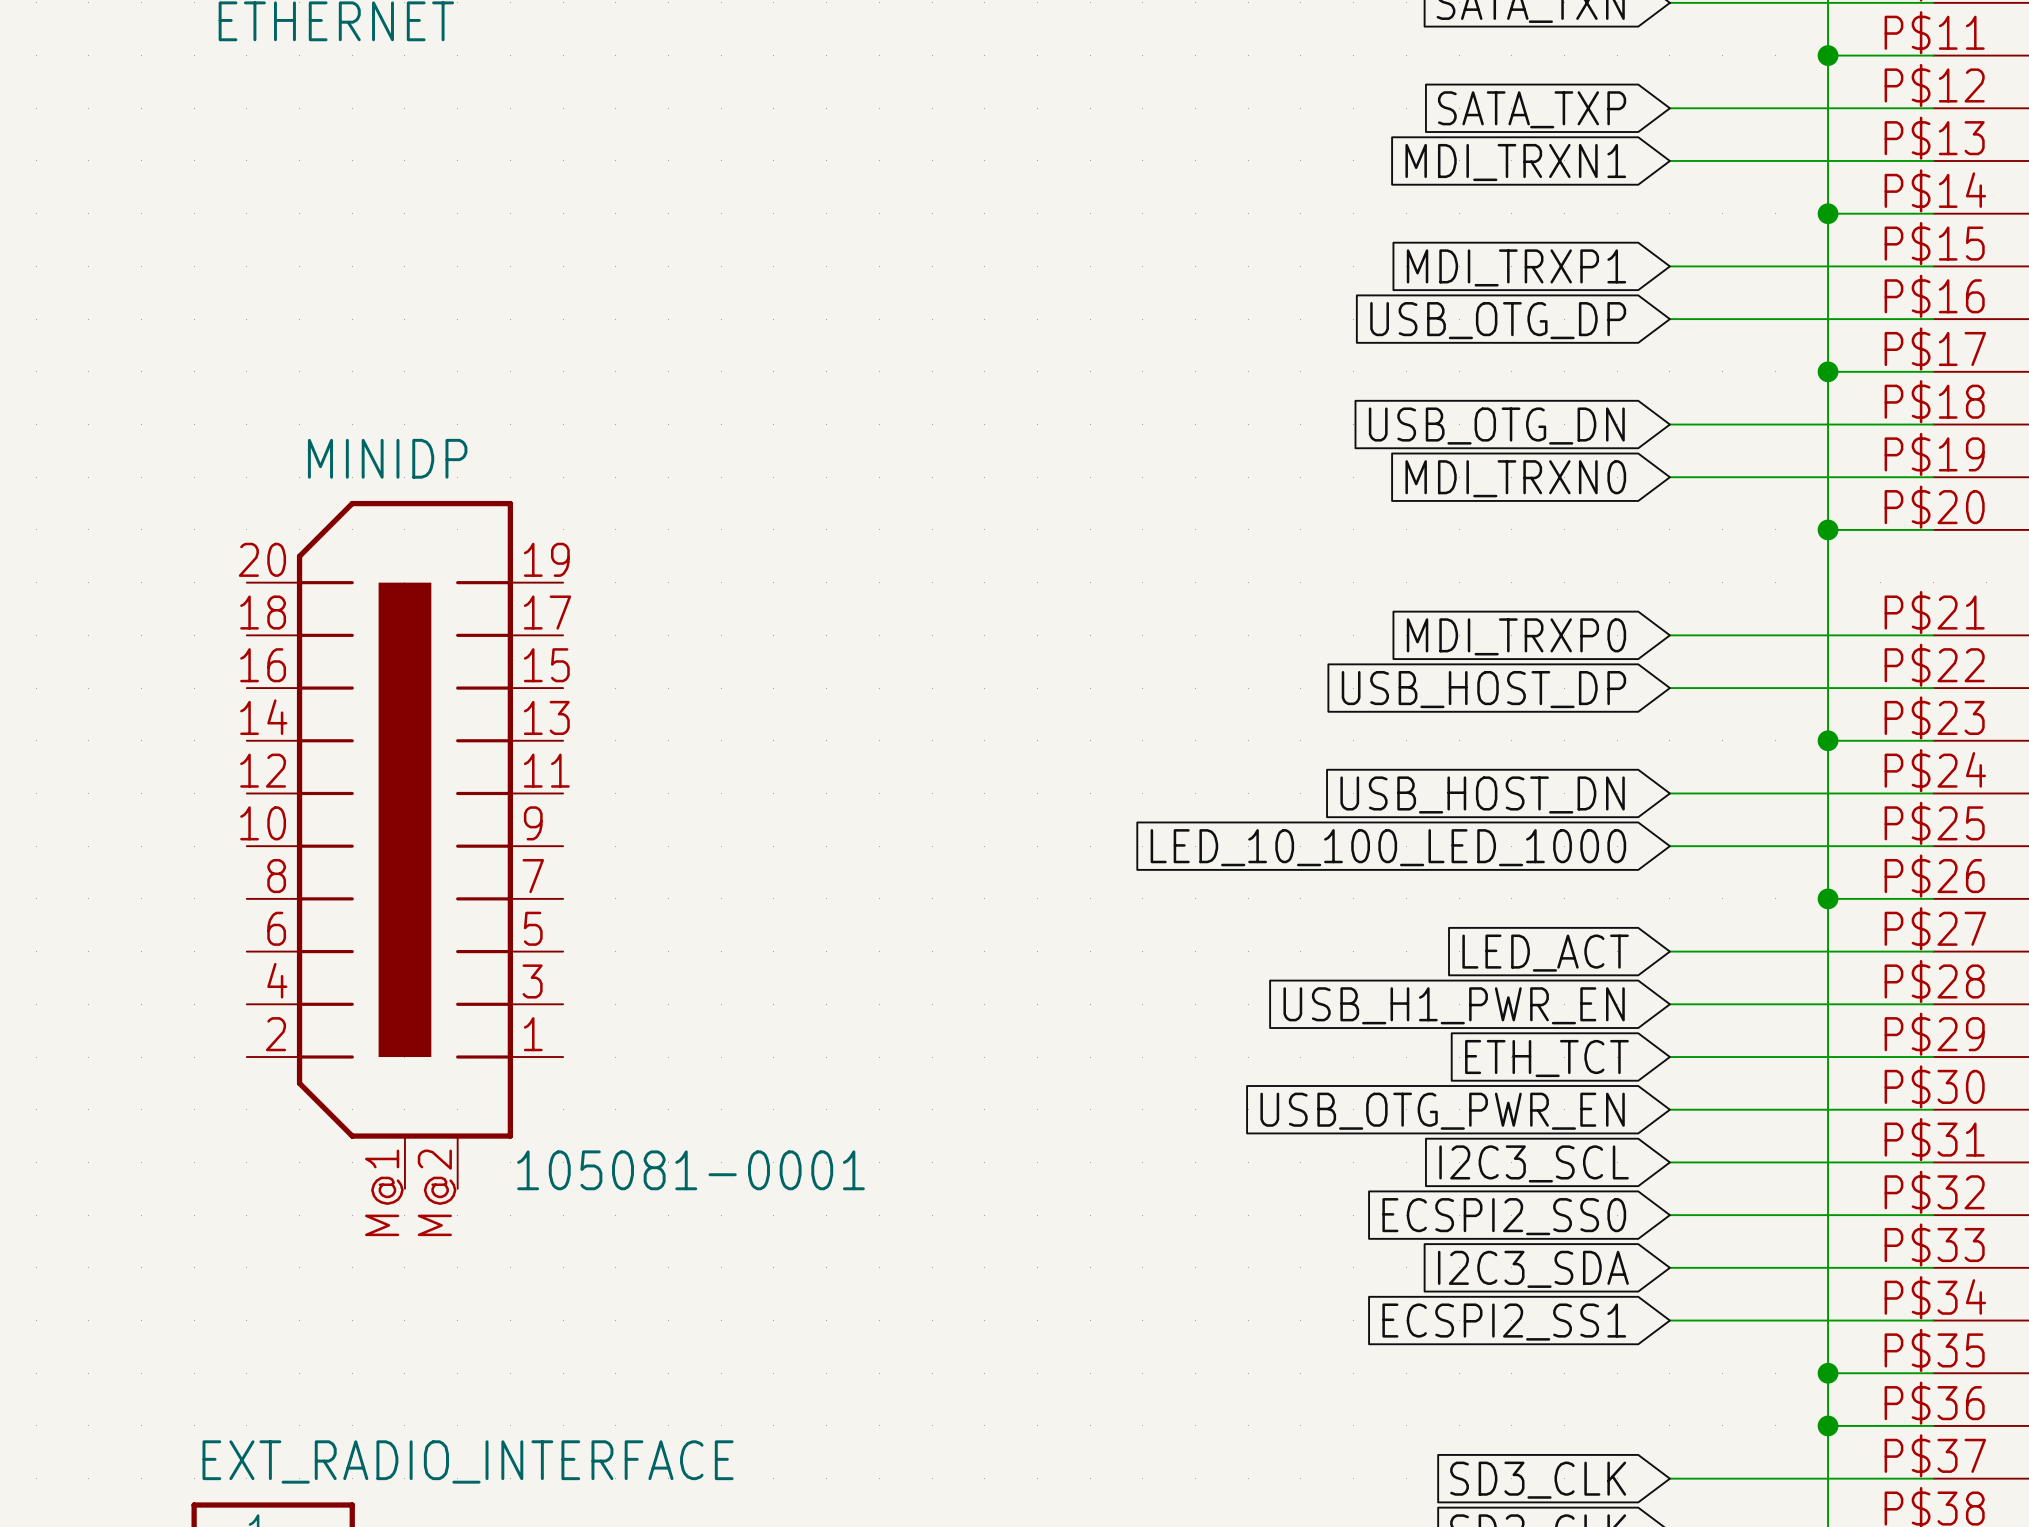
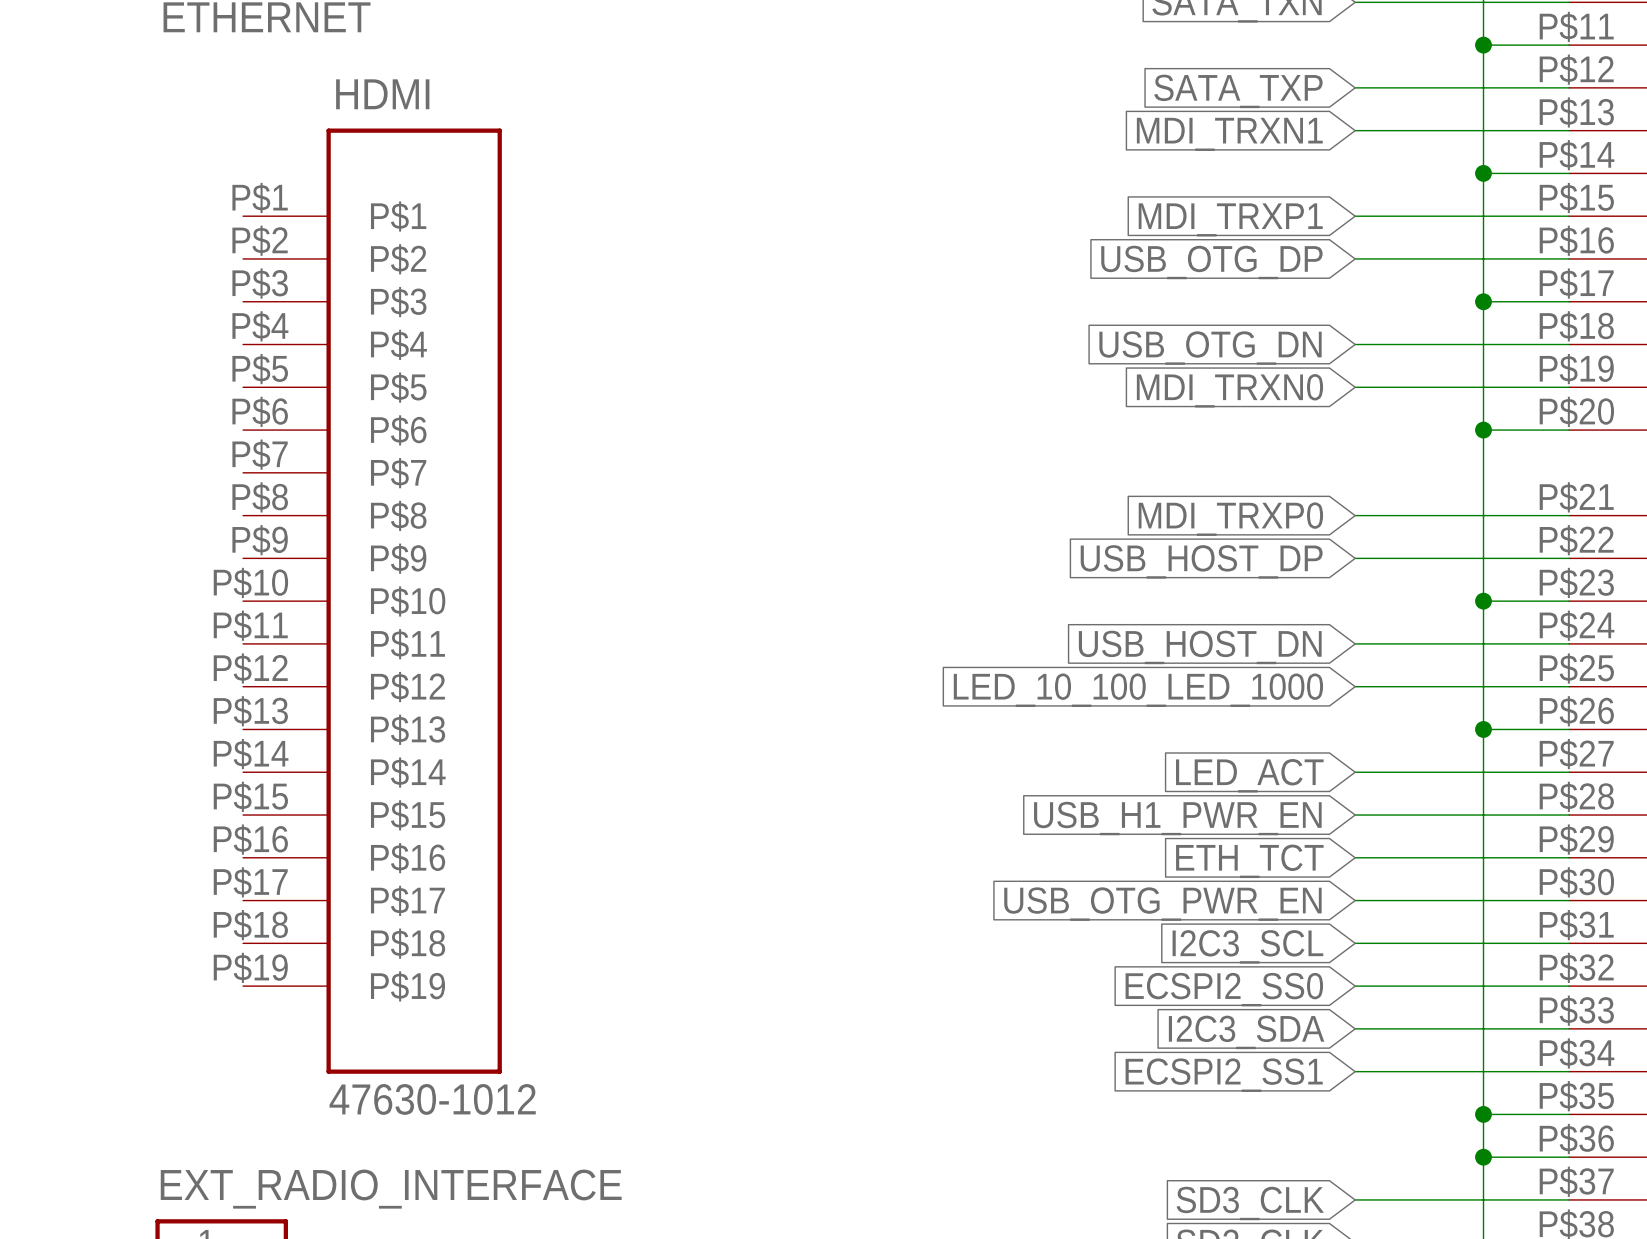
HDMI: none -> 47630-1012 (372, 601)
MINIDP: 105081-0001 (404, 844) -> none

